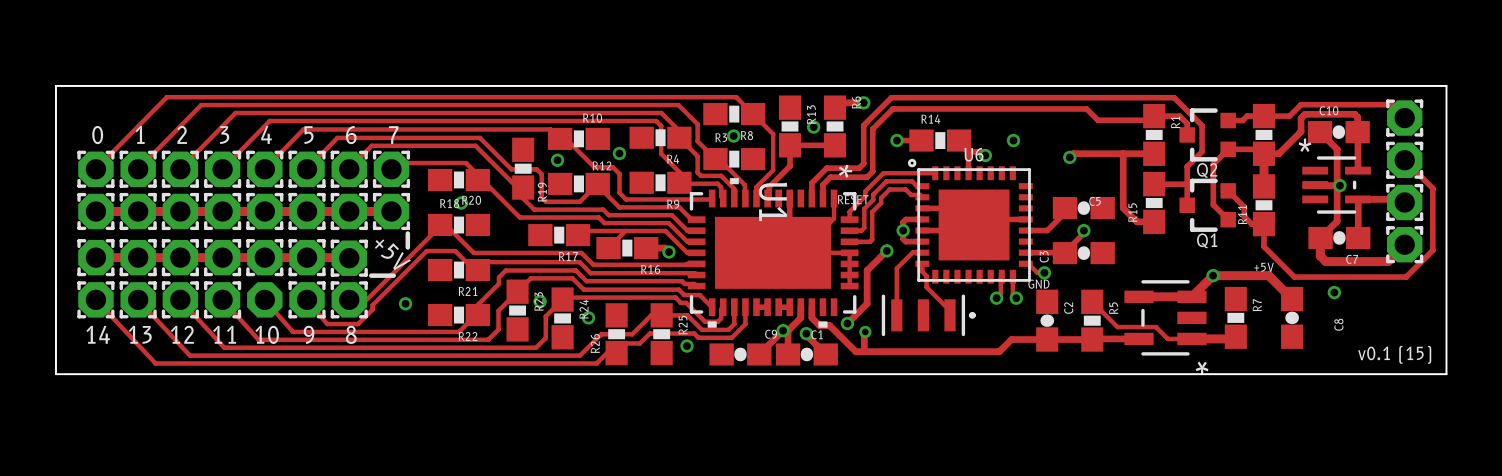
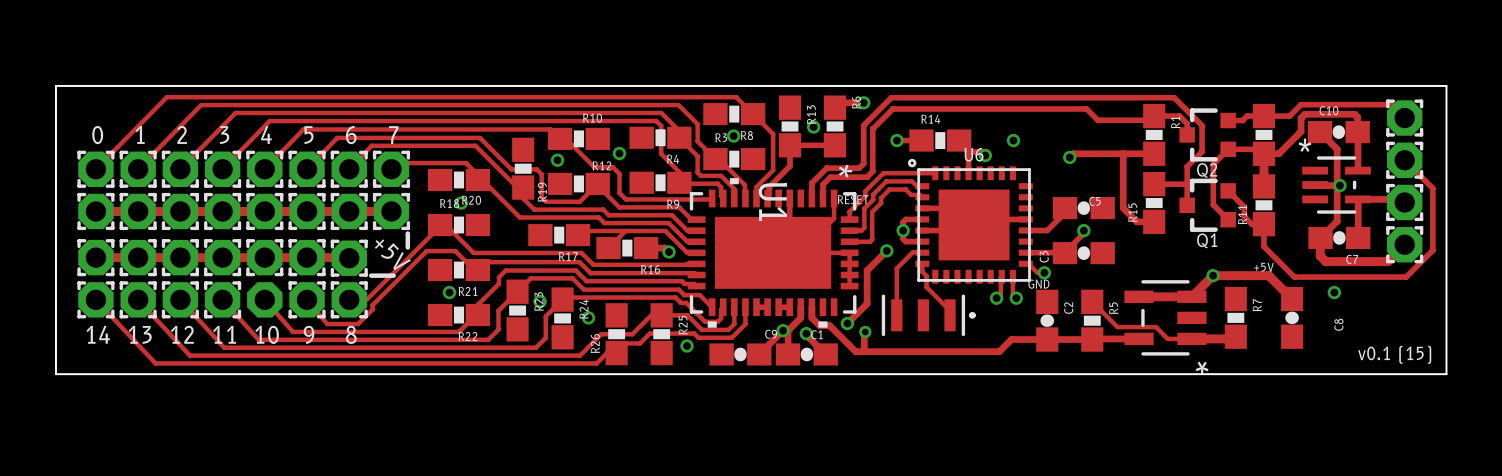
via position: (405, 303) -> (449, 292)

